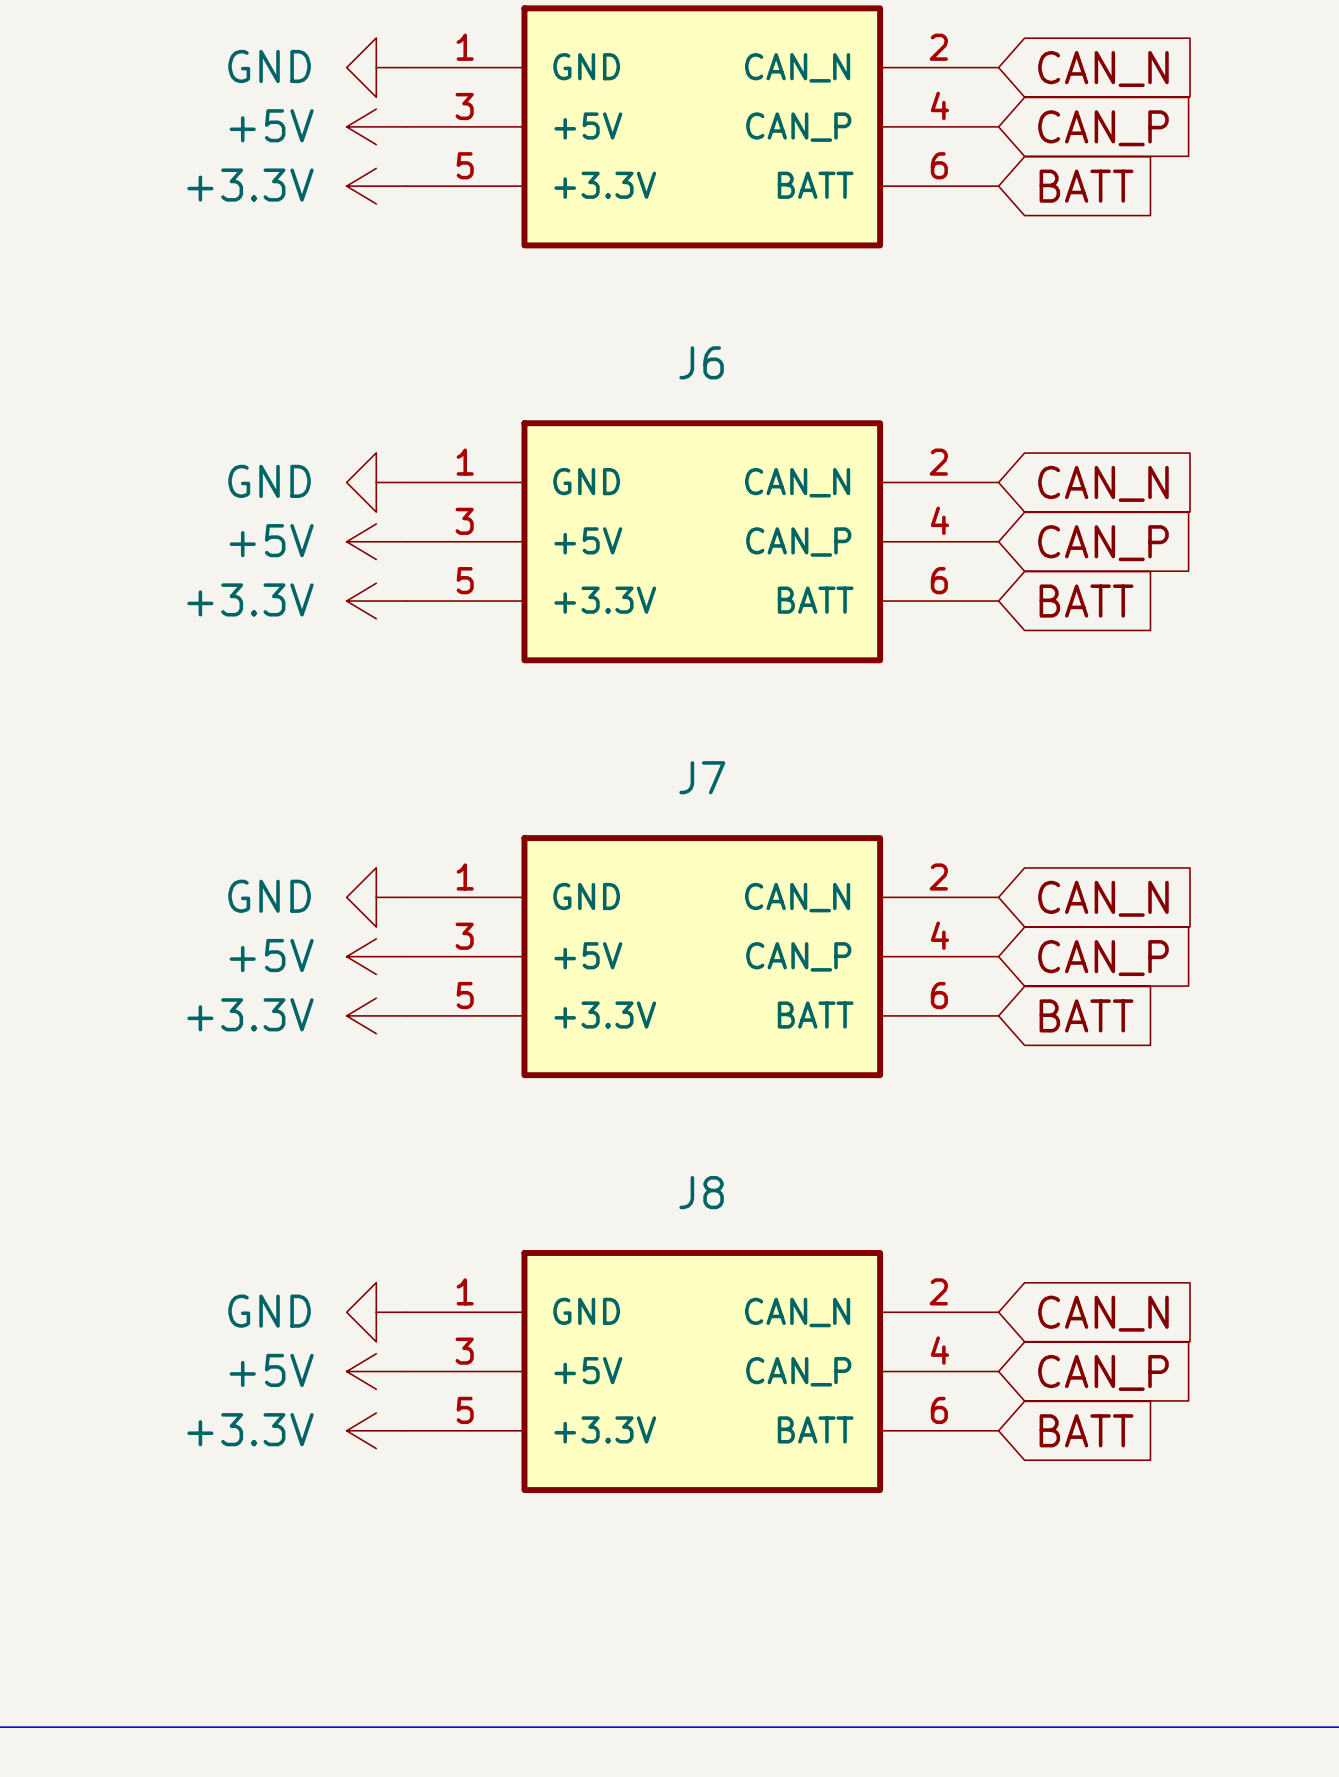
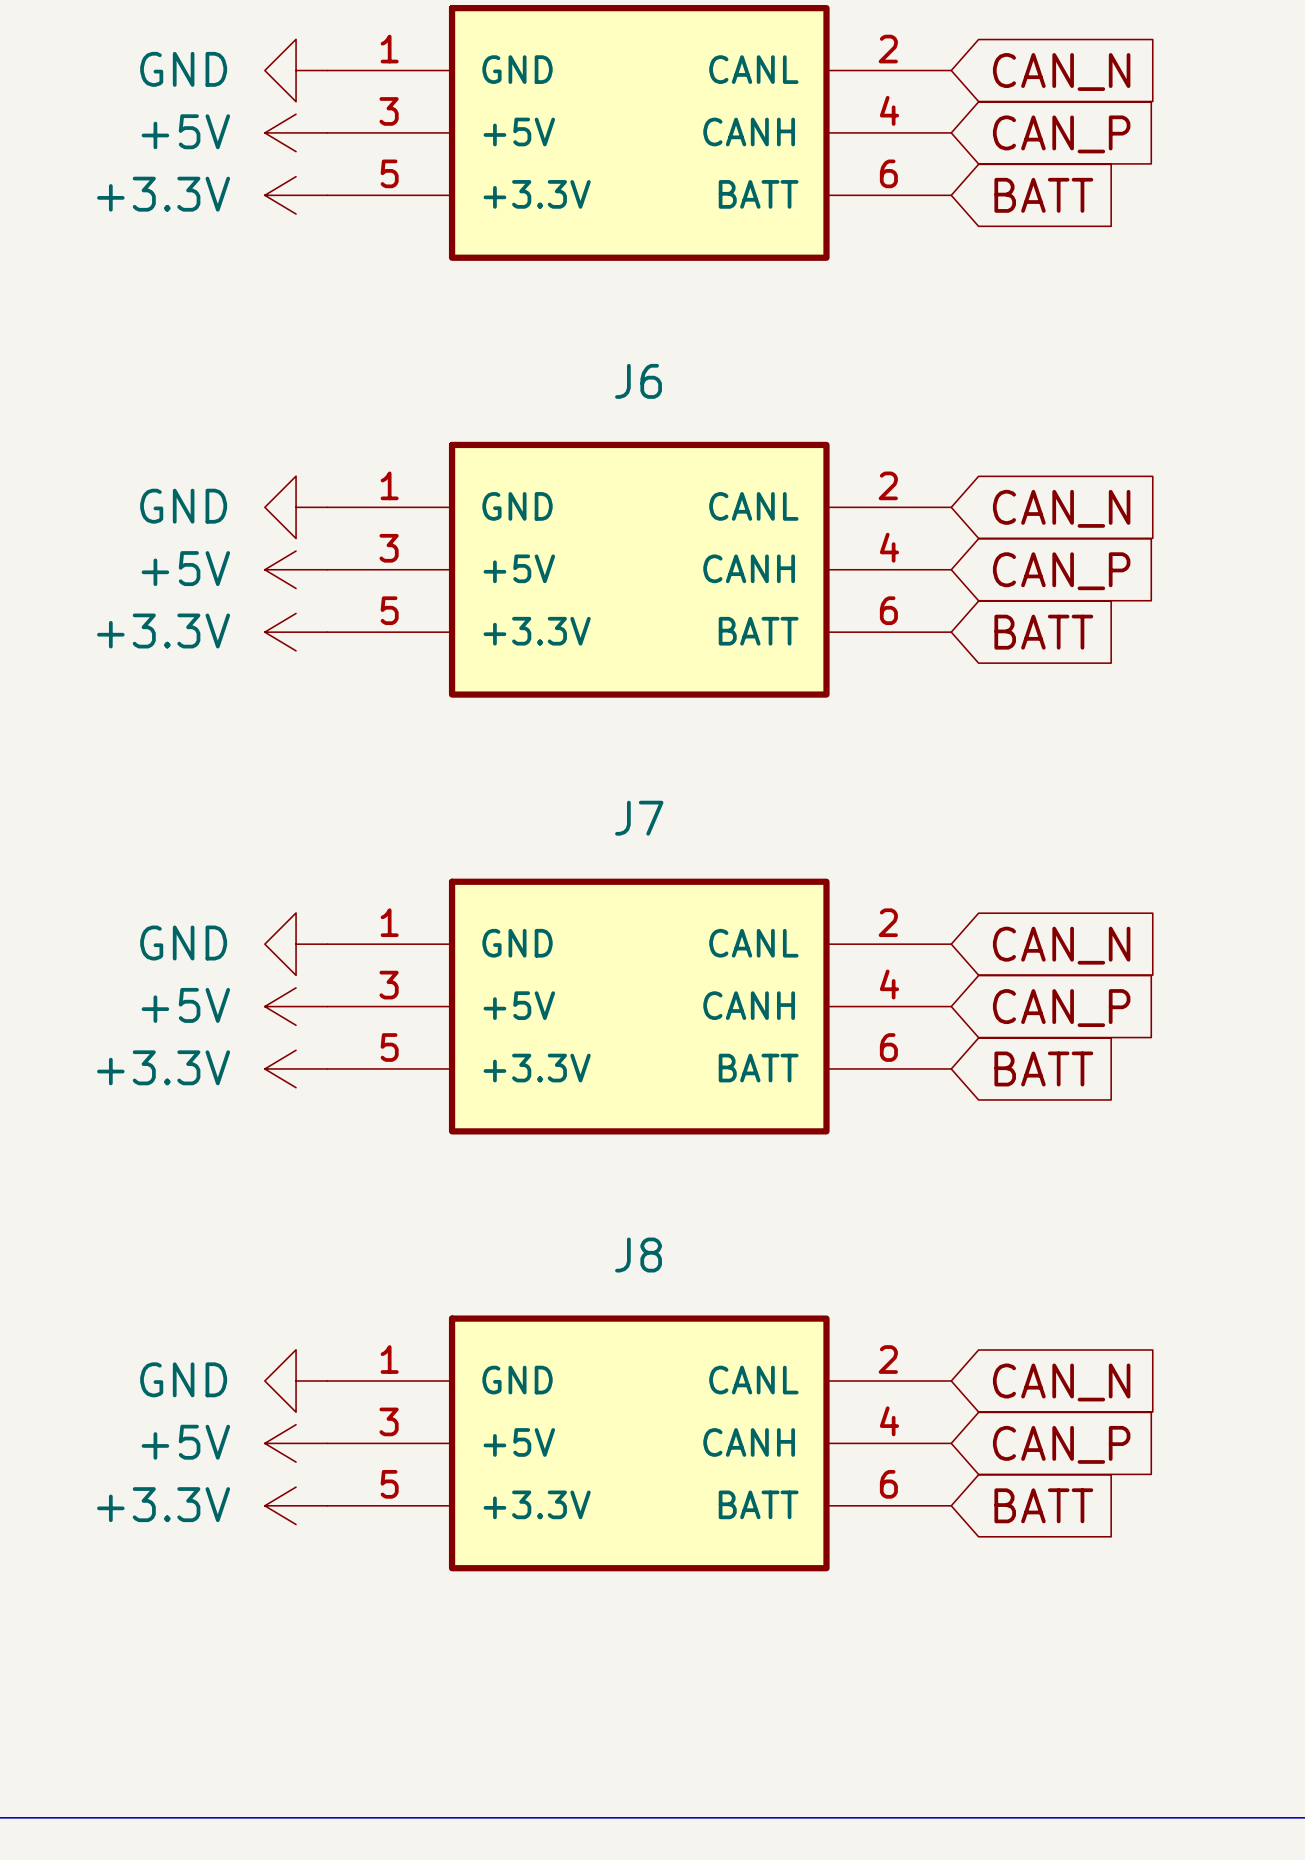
part pin name: CAN_N (797, 67) -> CANL (753, 69)
part pin name: CAN_P (798, 127) -> CANH (749, 131)
J6 pin name: CAN_N (797, 482) -> CANL (753, 506)
J6 pin name: CAN_P (798, 542) -> CANH (749, 568)
J7 pin name: CAN_N (797, 897) -> CANL (753, 943)
J7 pin name: CAN_P (798, 956) -> CANH (749, 1005)
J8 pin name: CAN_N (797, 1312) -> CANL (753, 1380)
J8 pin name: CAN_P (798, 1371) -> CANH (749, 1442)

